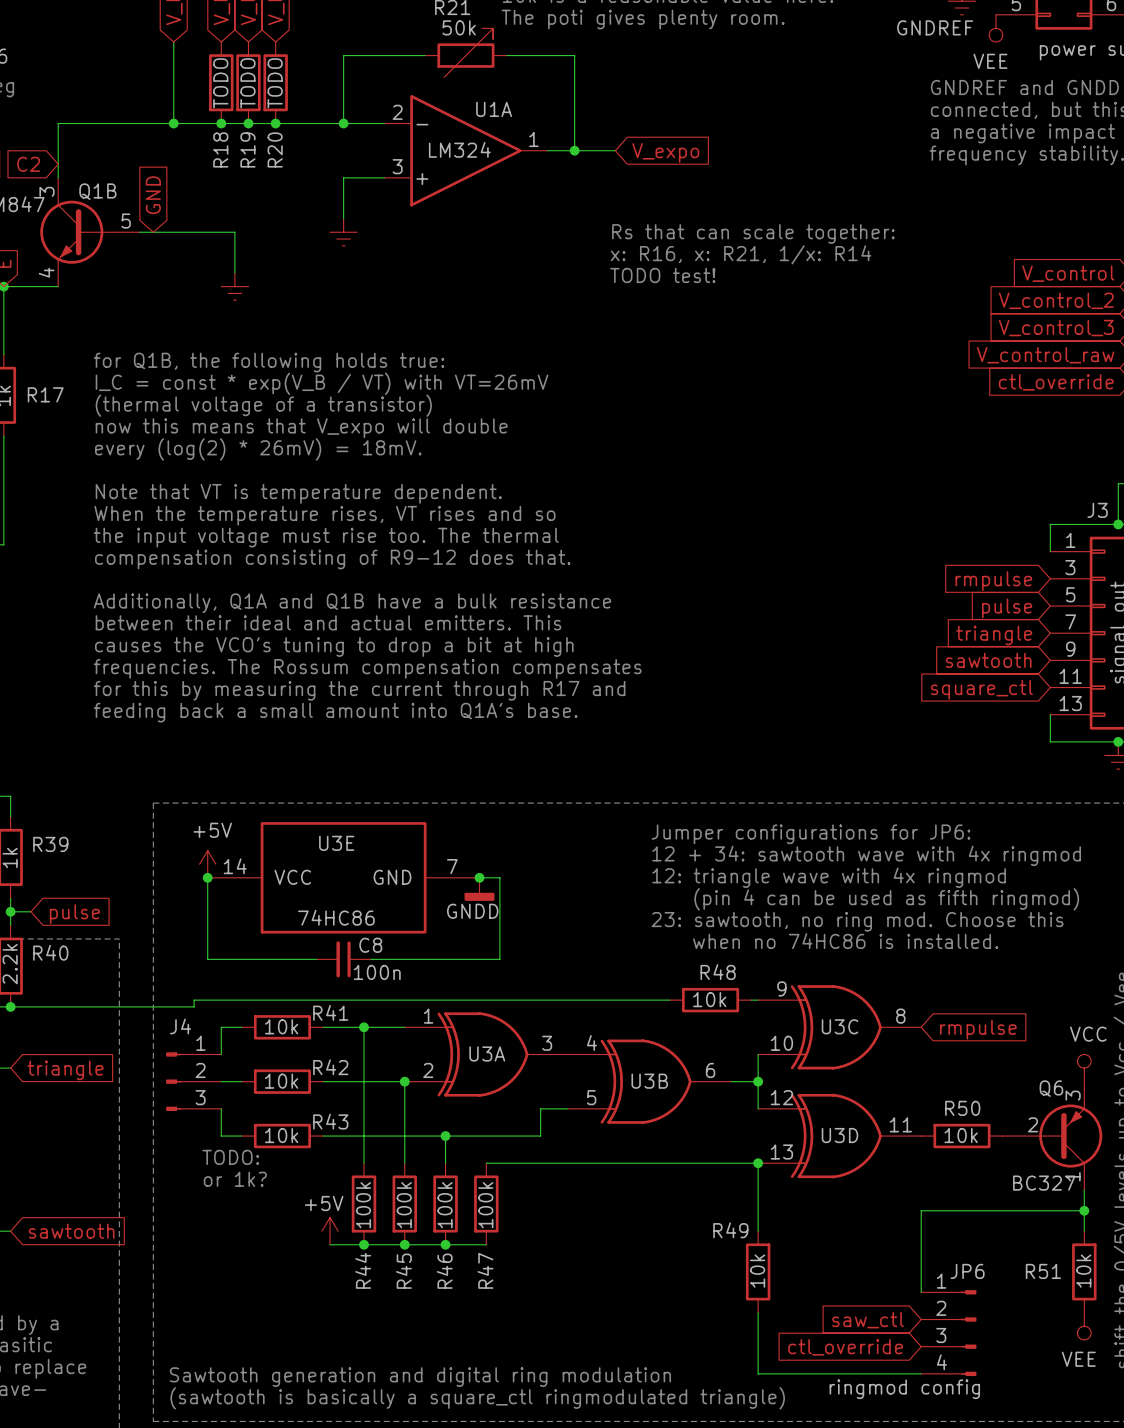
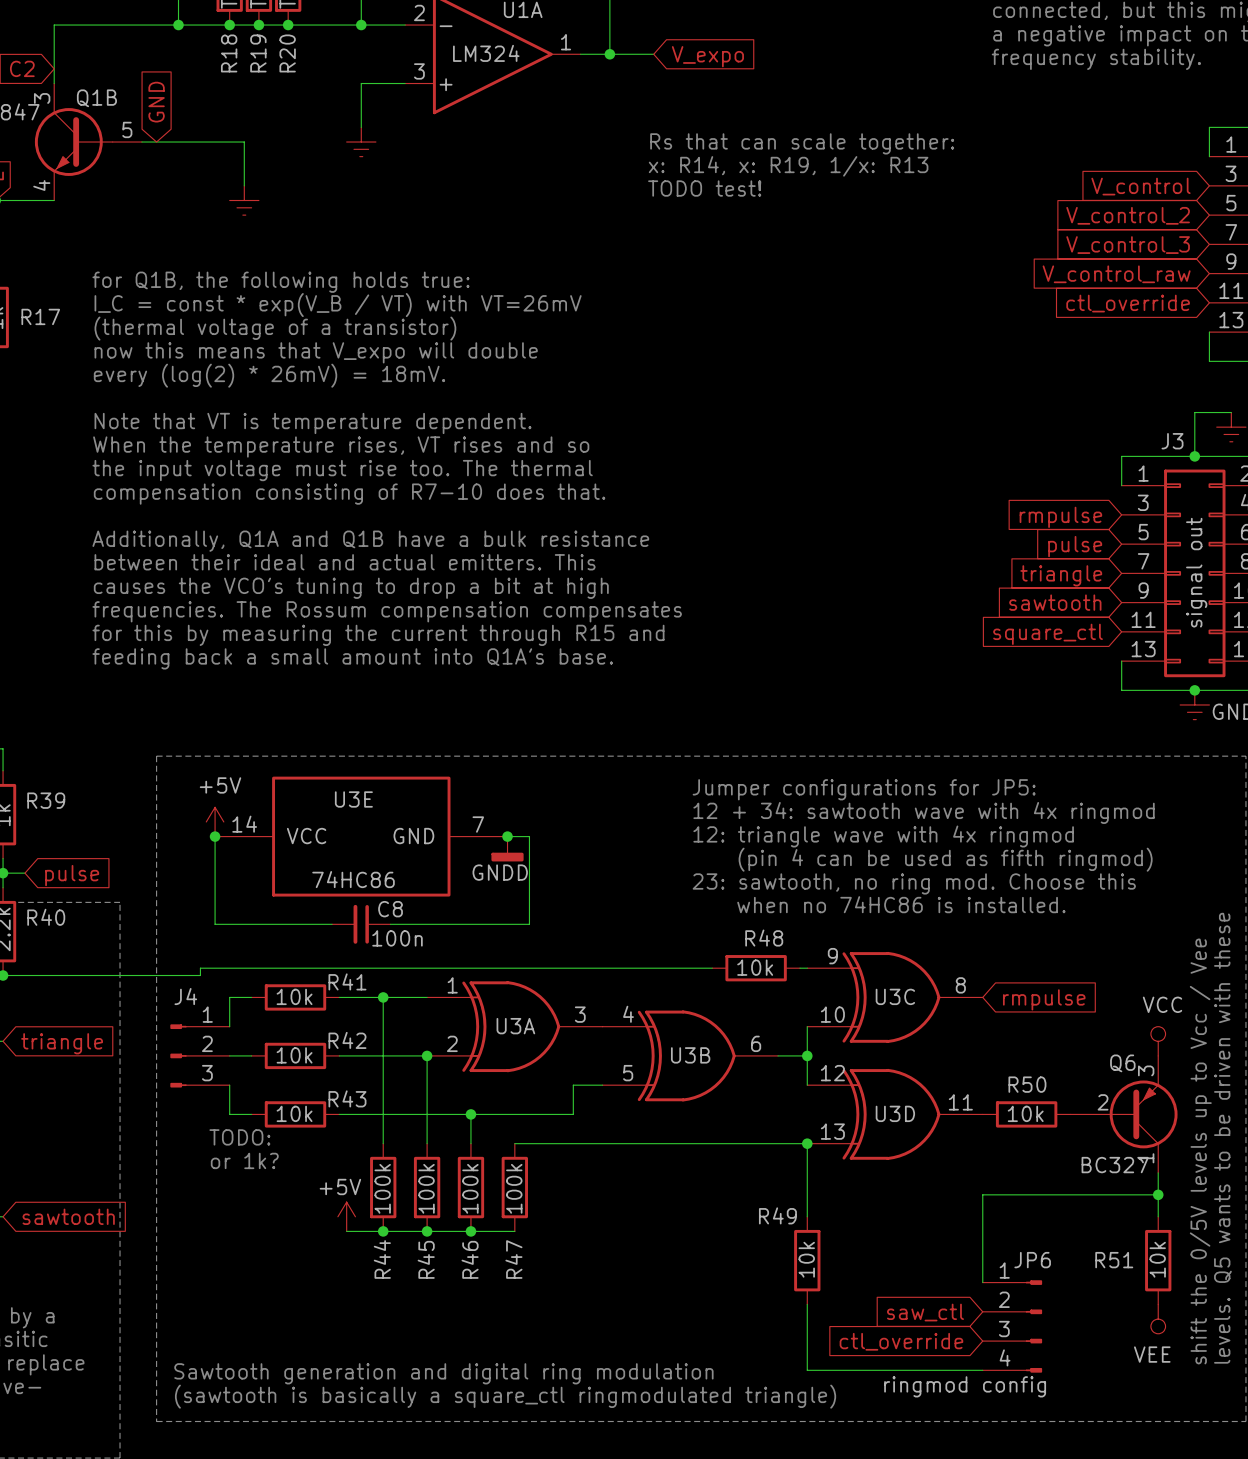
text: x: R16, x: R21, 1/x: R14 (741, 254) -> x: R14, x: R19, 1/x: R13 (788, 166)
text: compensation consisting of R9-12 does that. (332, 559) -> compensation consisting of R7-10 does that. (349, 494)
text: for this by measuring the current through R17 and (359, 690) -> for this by measuring the current through R15 and (378, 635)
text: Jumper configurations for JP6: (810, 834) -> Jumper configurations for JP5: (864, 789)

